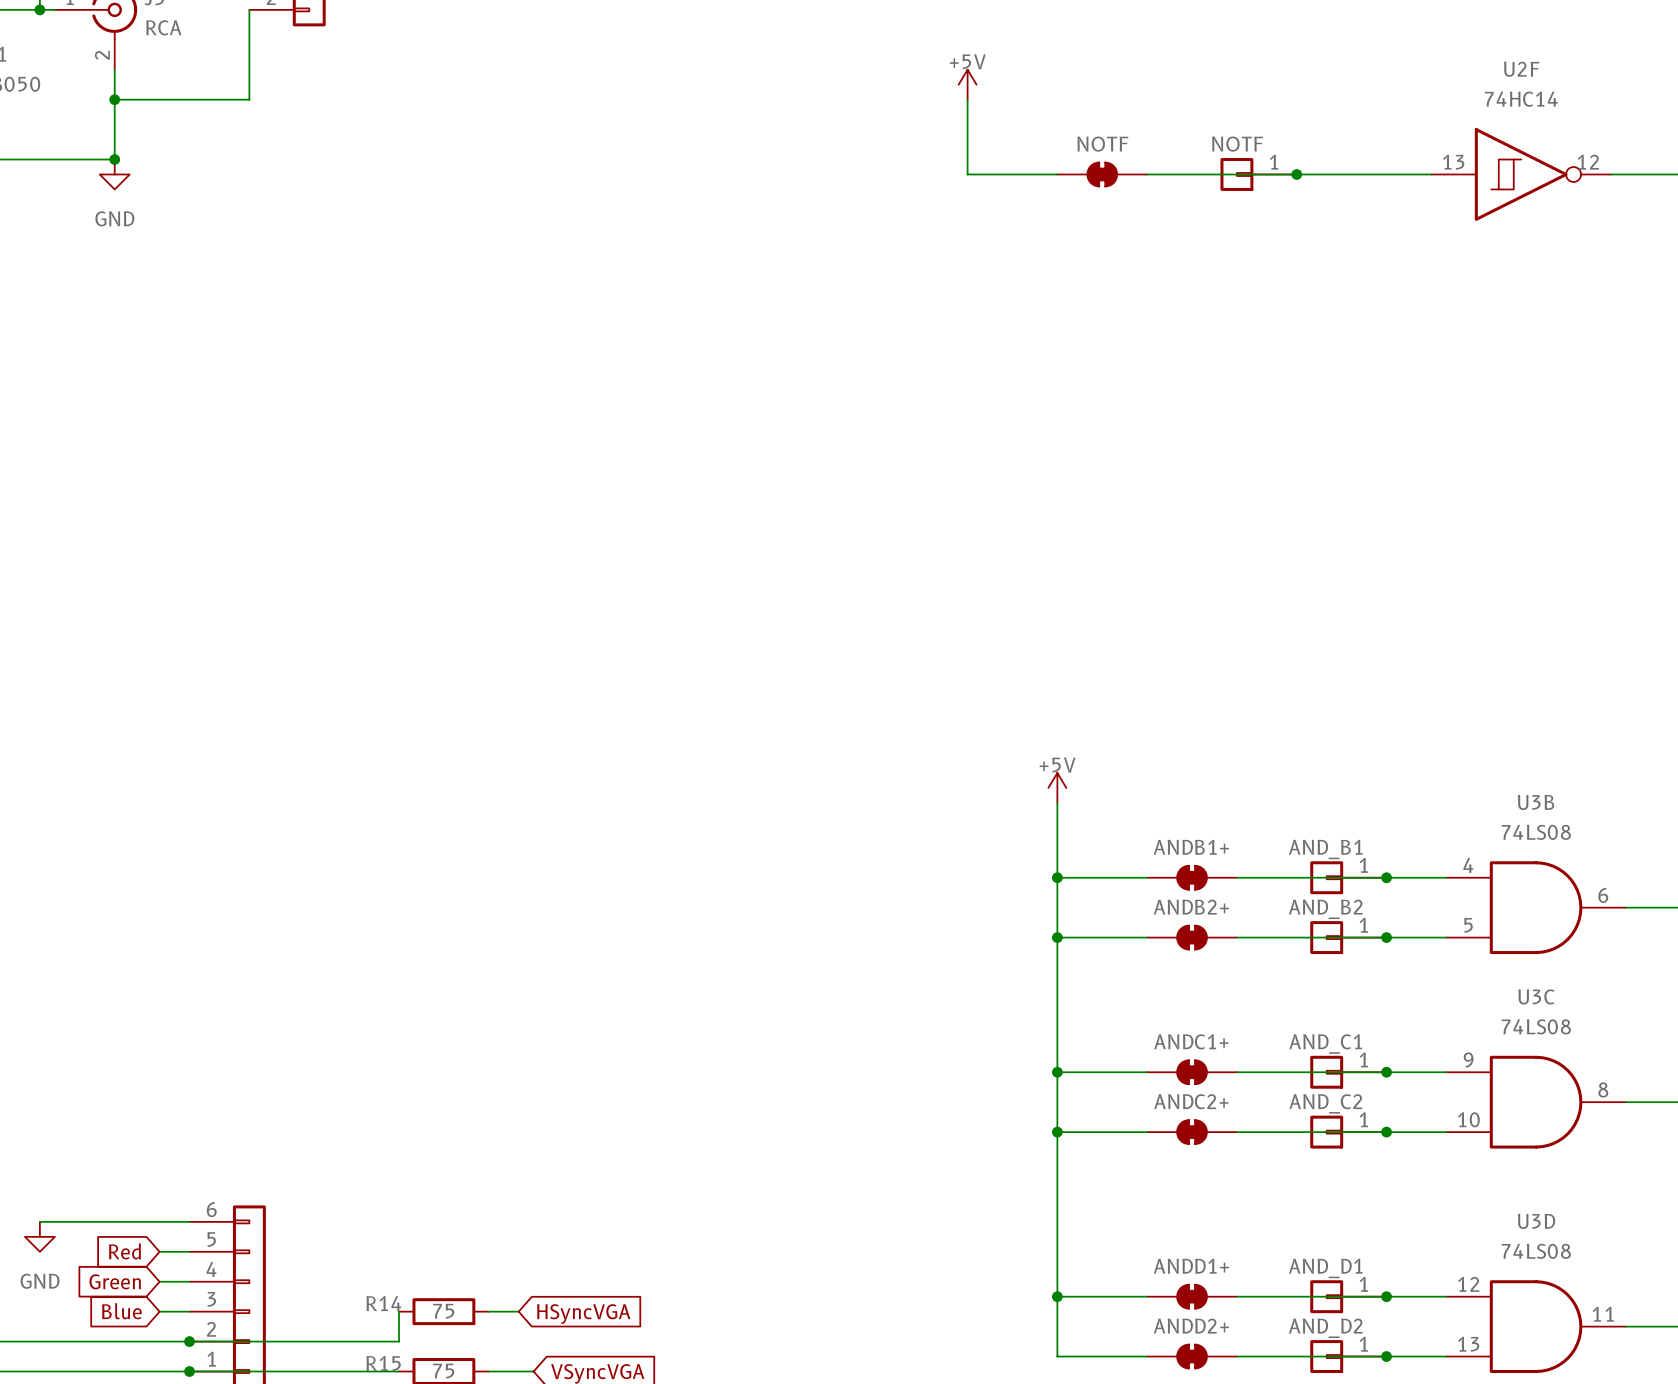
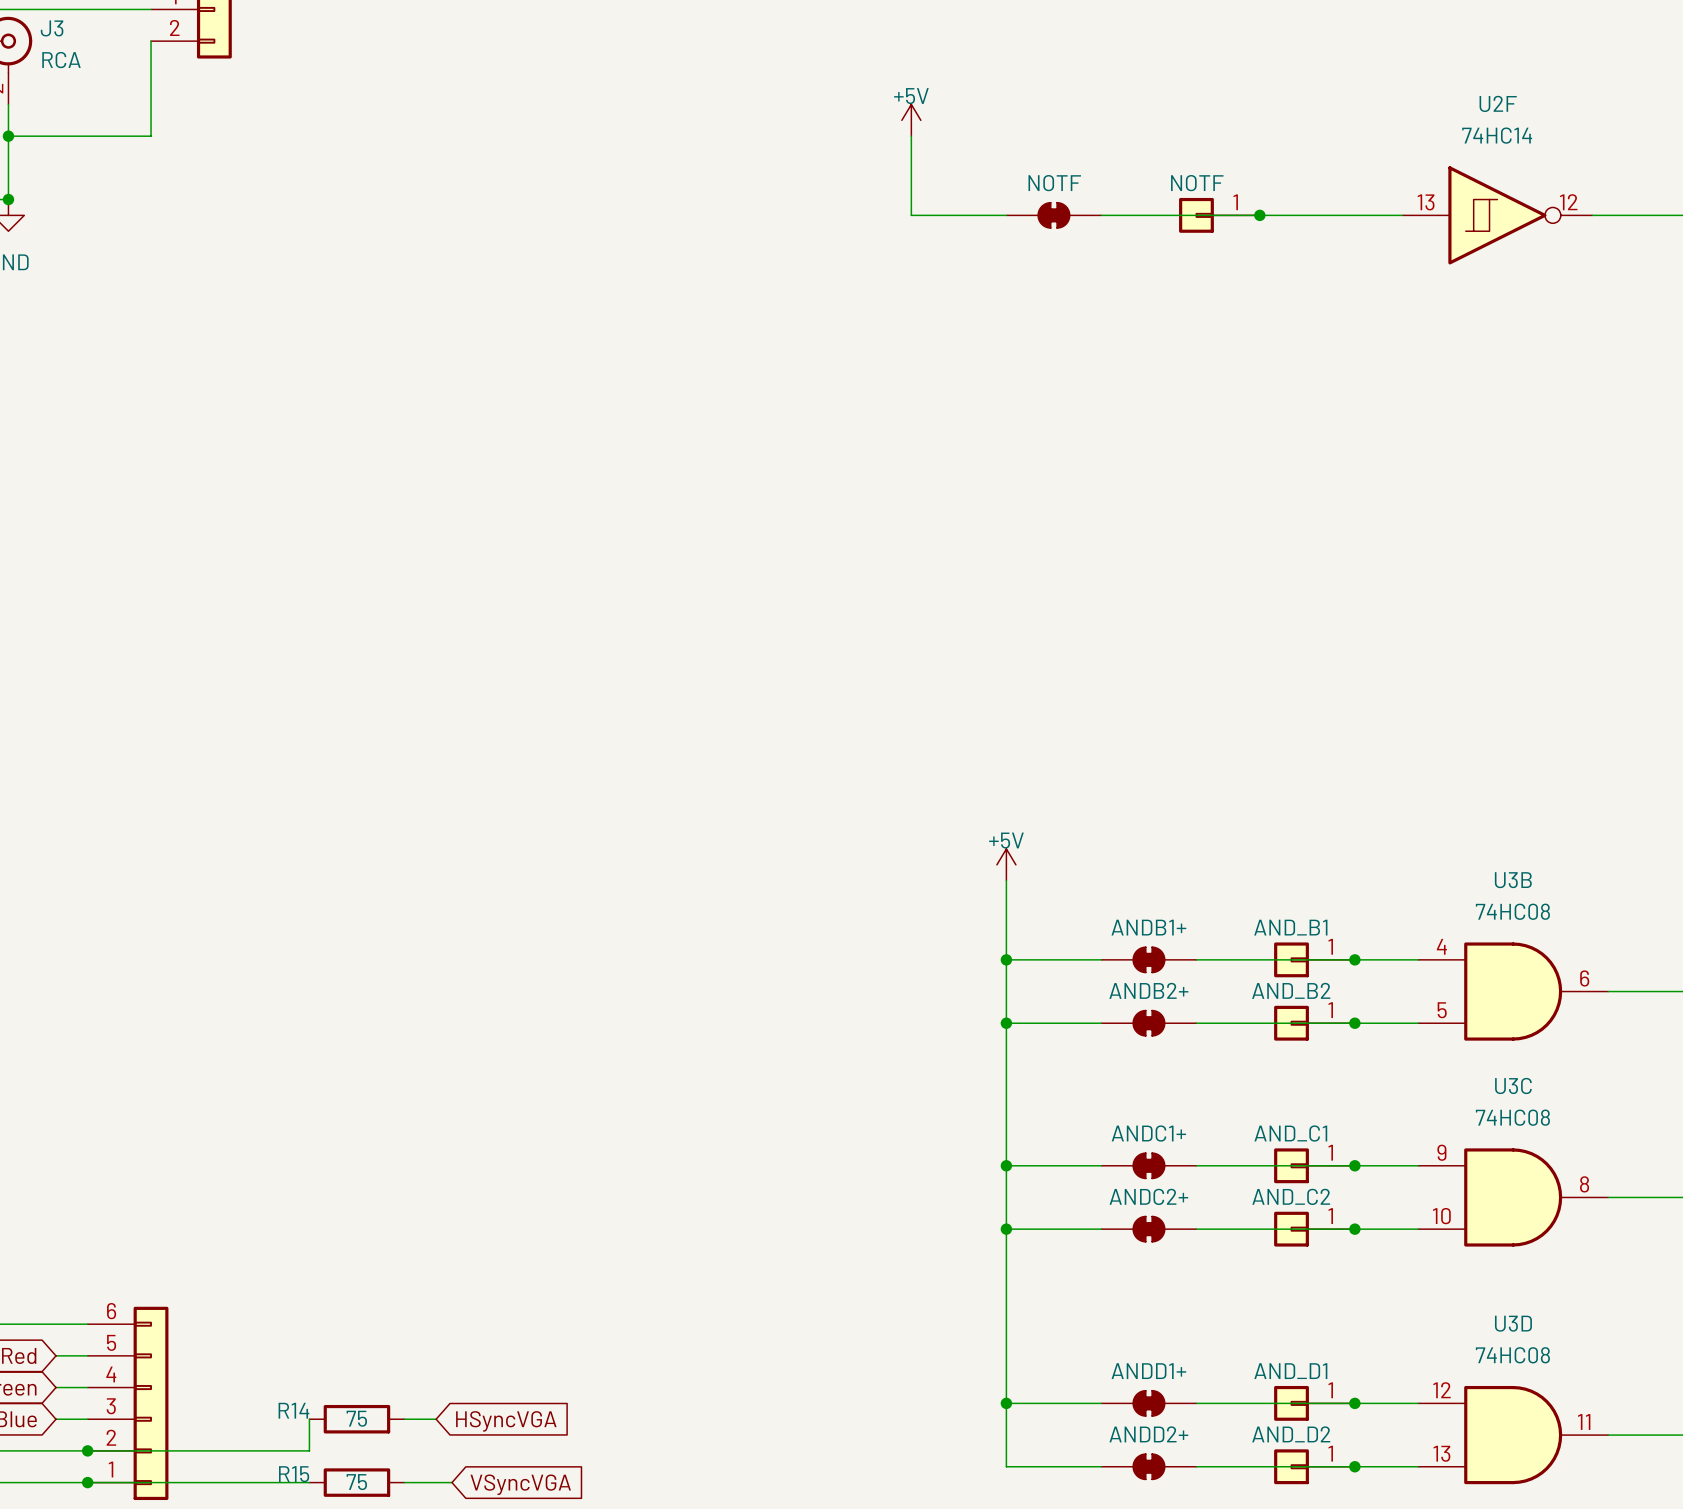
U3B value: 74LS08 (1536, 832) -> 74HC08 (1512, 911)
U3C value: 74LS08 (1536, 1026) -> 74HC08 (1512, 1117)
U3D value: 74LS08 (1536, 1251) -> 74HC08 (1512, 1355)

